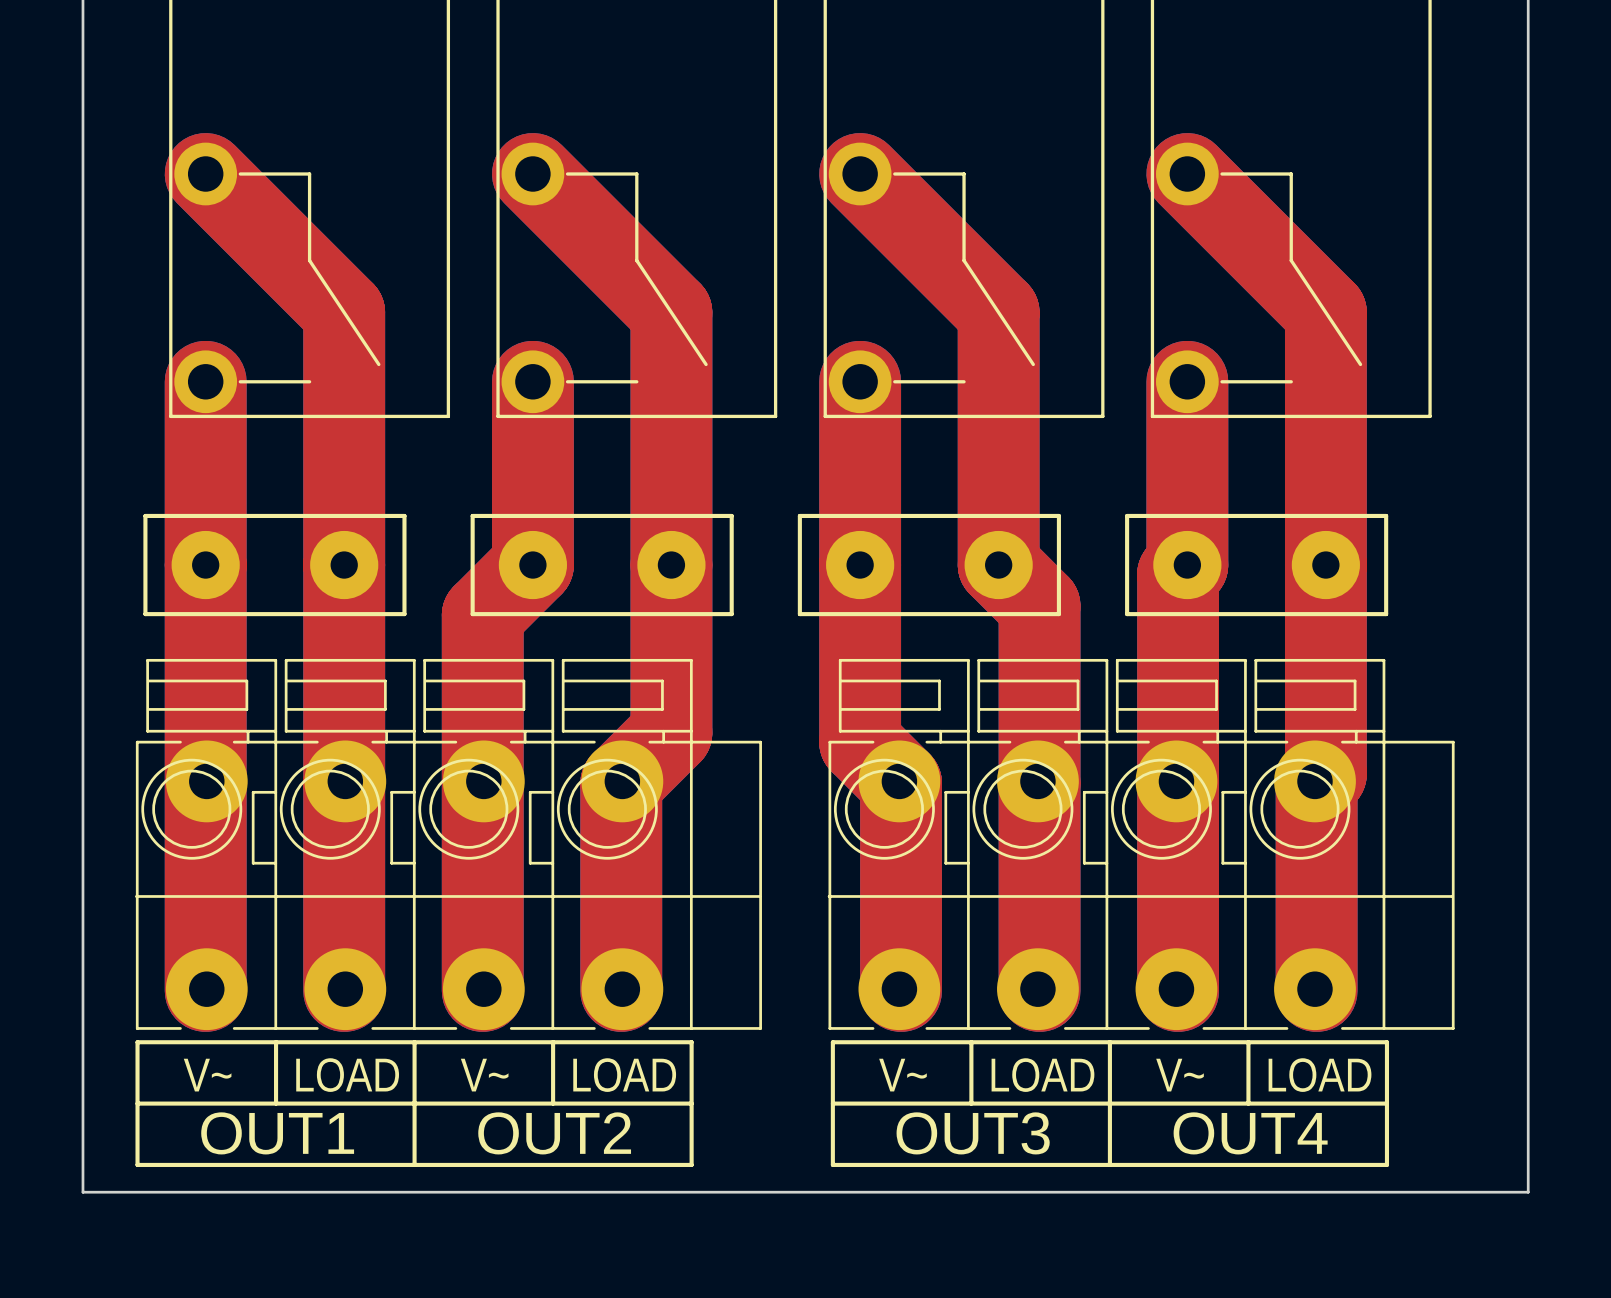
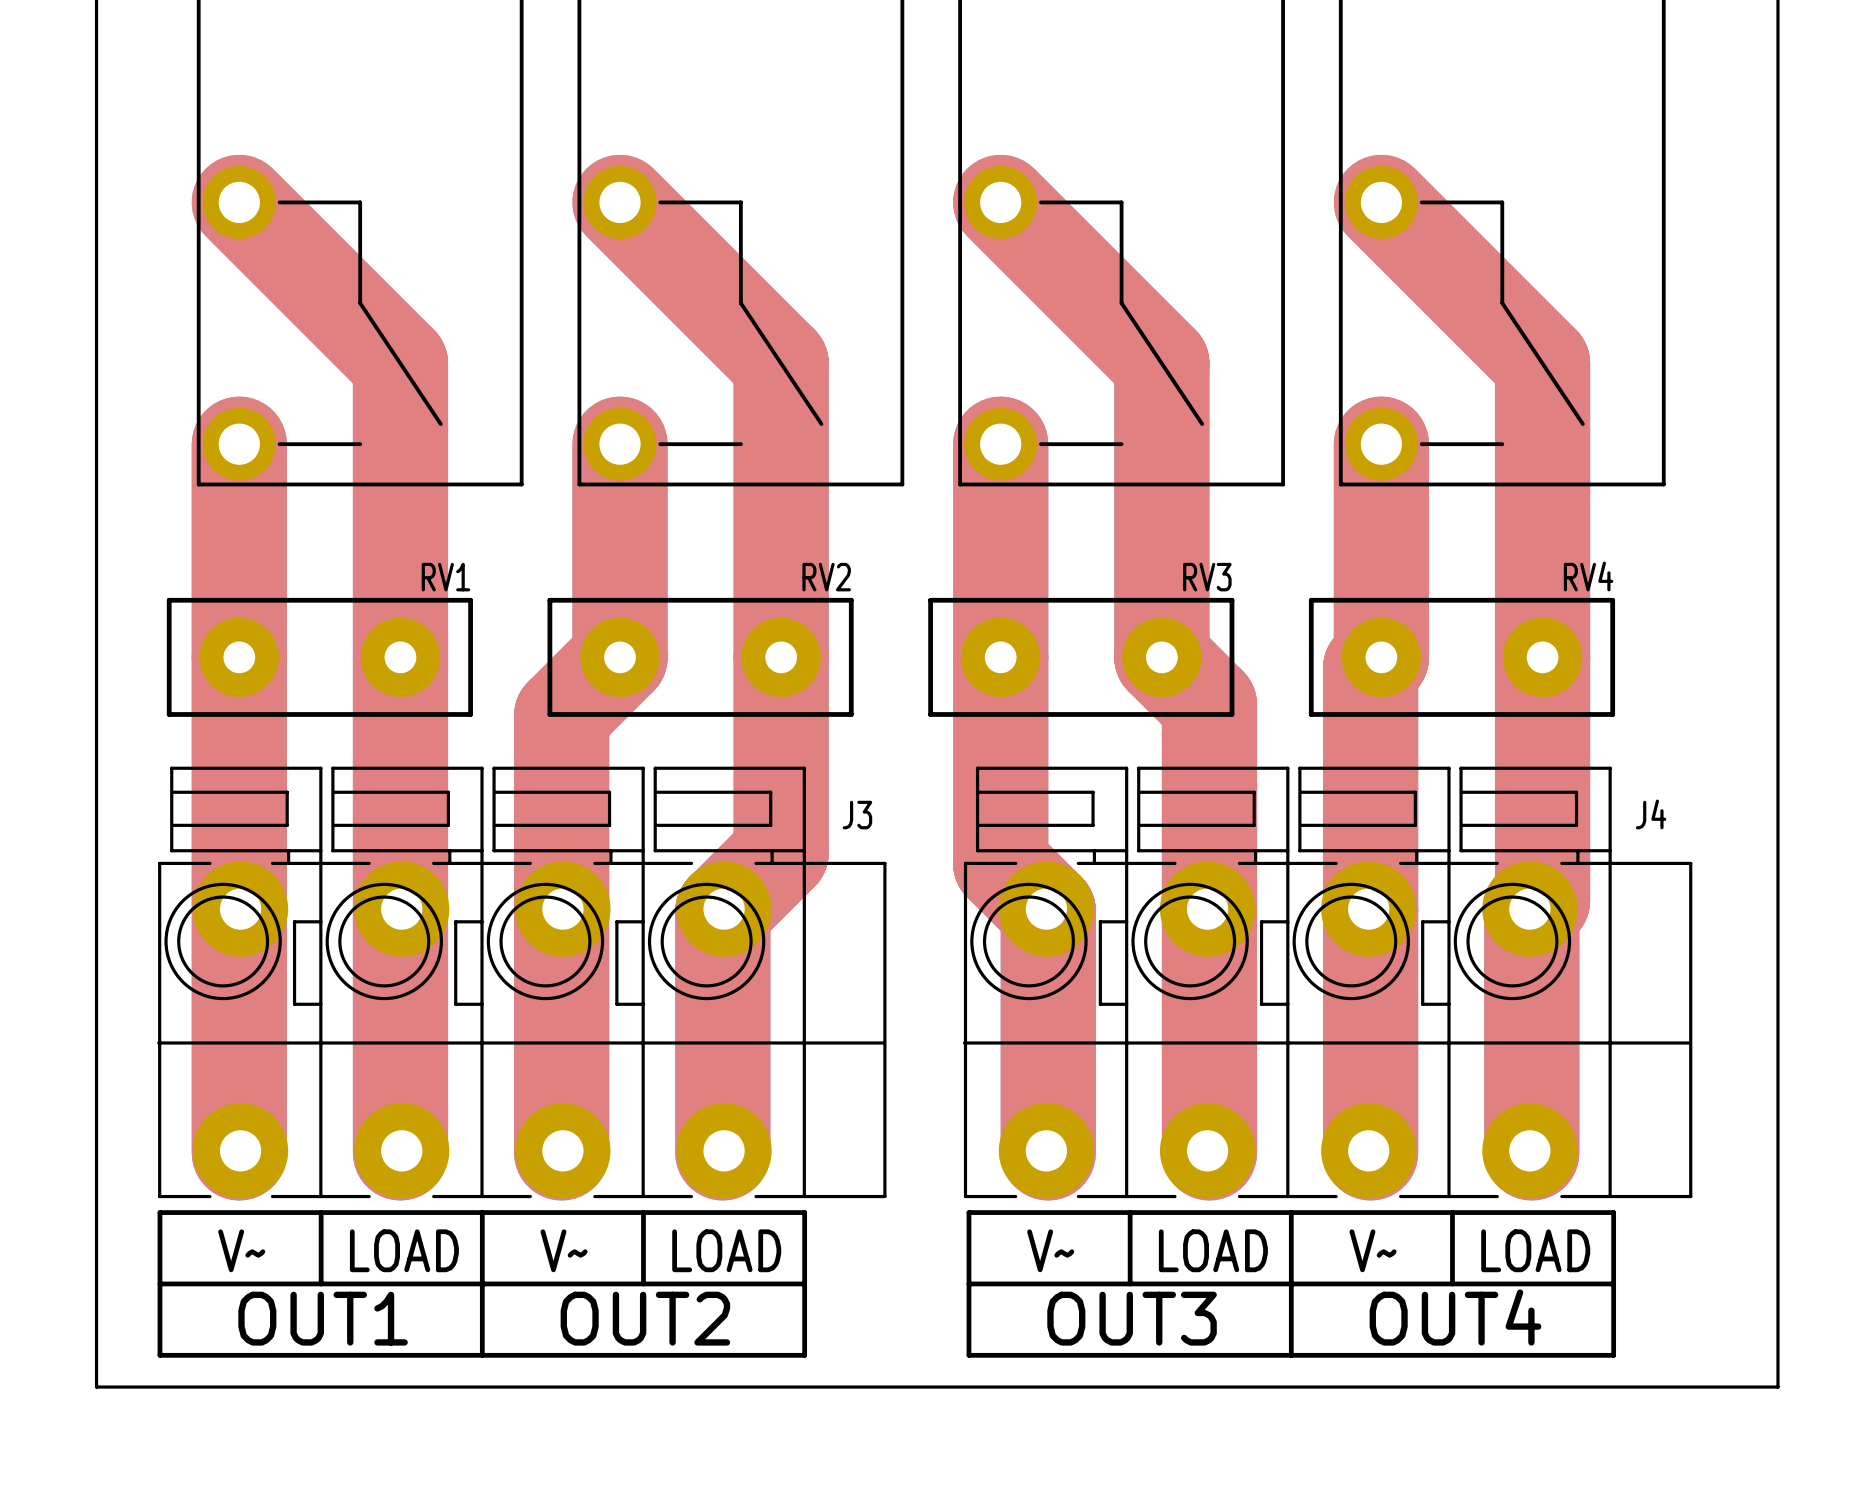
RV2 name: none -> RV2 (826, 577)
RV1 name: none -> RV1 (445, 577)
RV3 name: none -> RV3 (1207, 577)
RV4 name: none -> RV4 (1588, 576)
J3 name: none -> J3 (857, 815)
J4 name: none -> J4 (1651, 814)

